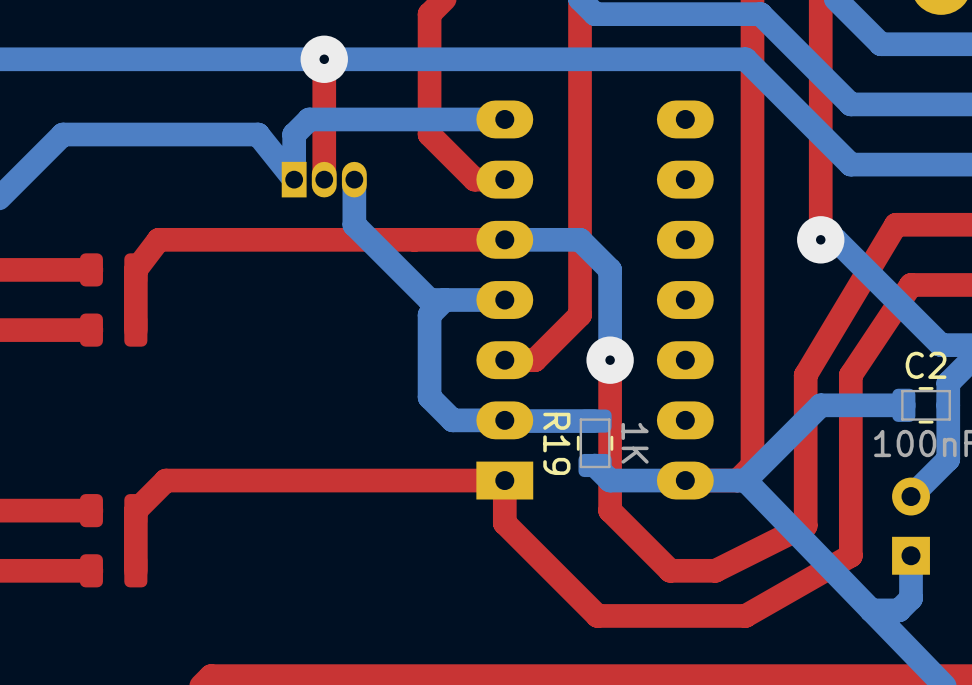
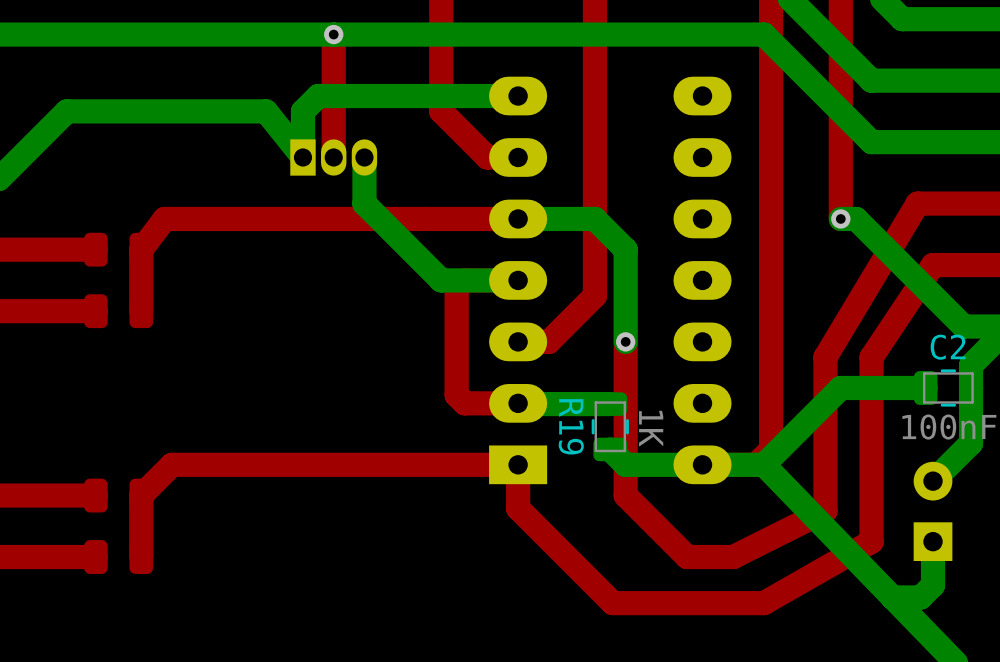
via size: [300, 35, 348, 83] -> [324, 24, 344, 45]
via size: [797, 216, 845, 264] -> [831, 209, 851, 229]
bottom track: (444, 300) (429, 315) (429, 397) (452, 420) (504, 420) -> none
top track: none -> (518, 280) (464, 280) (456, 288) (456, 395) (464, 403) (518, 403)
via size: [586, 336, 634, 384] -> [616, 332, 636, 352]

